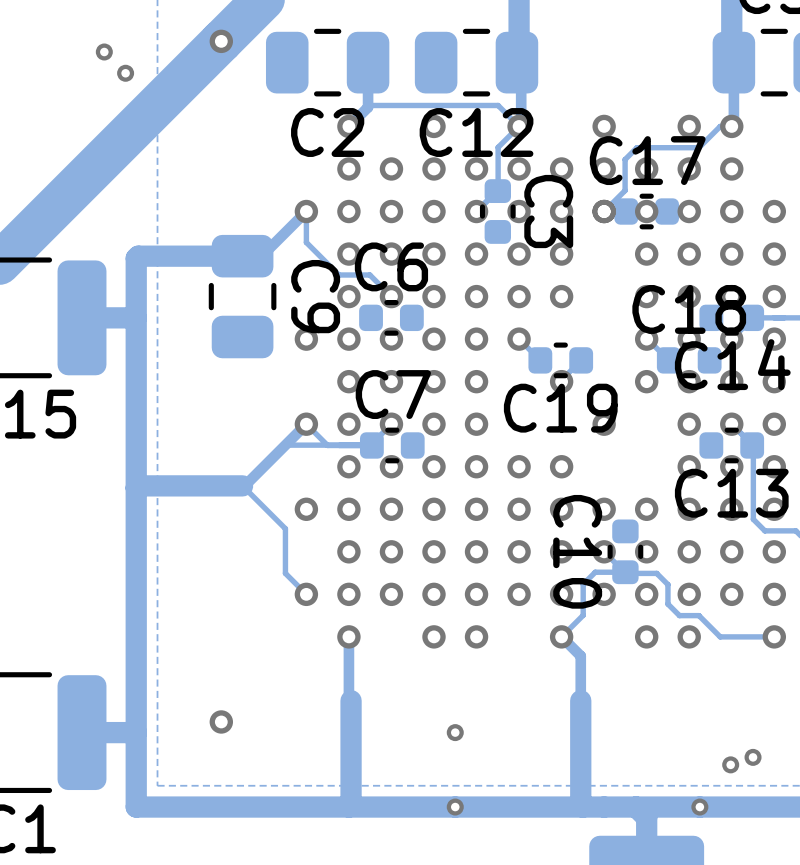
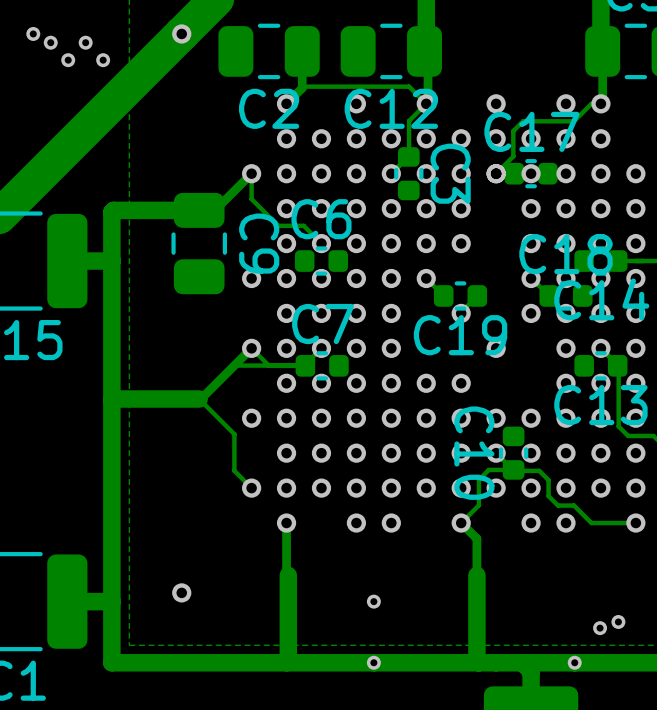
via: none -> (33, 33)
via: none -> (50, 42)
via: none -> (68, 60)

